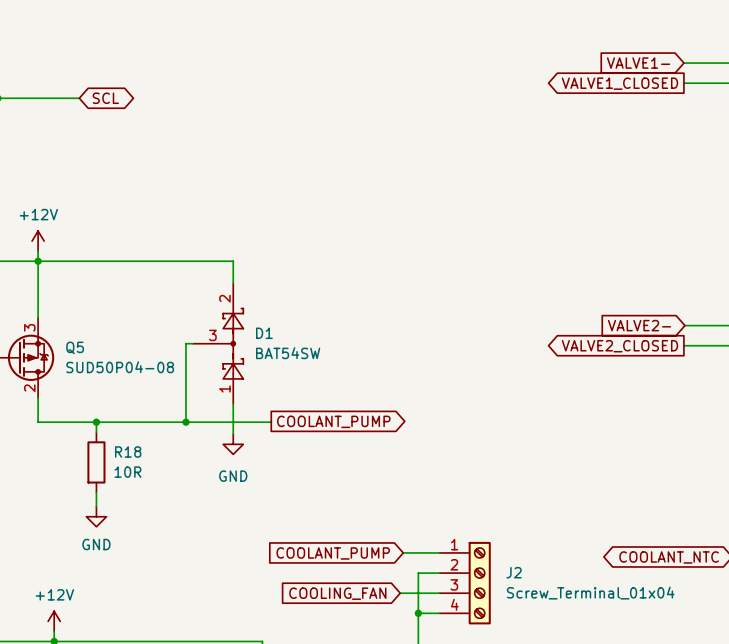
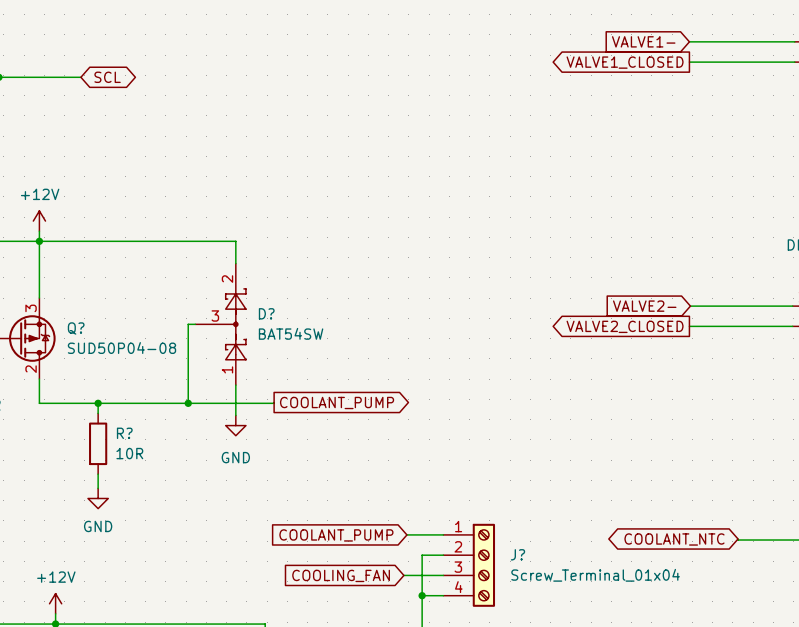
D1 name: D1 (264, 333) -> D? (266, 313)
Q5 name: Q5 (75, 347) -> Q? (76, 328)
R18 name: R18 (128, 451) -> R? (124, 433)
J2 name: J2 (514, 572) -> J? (517, 554)

